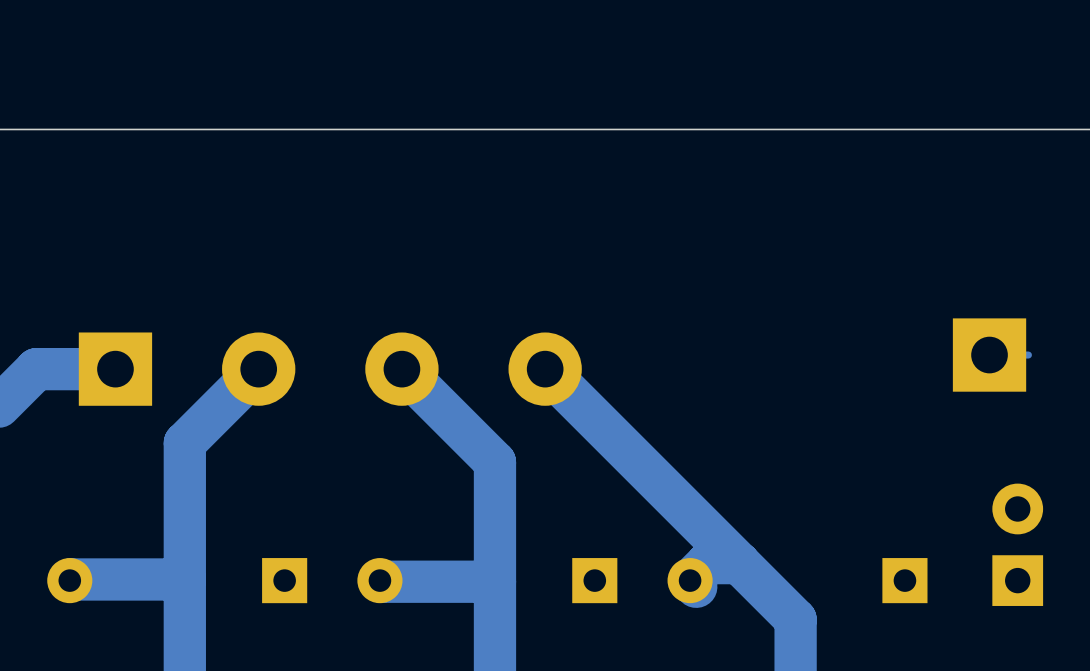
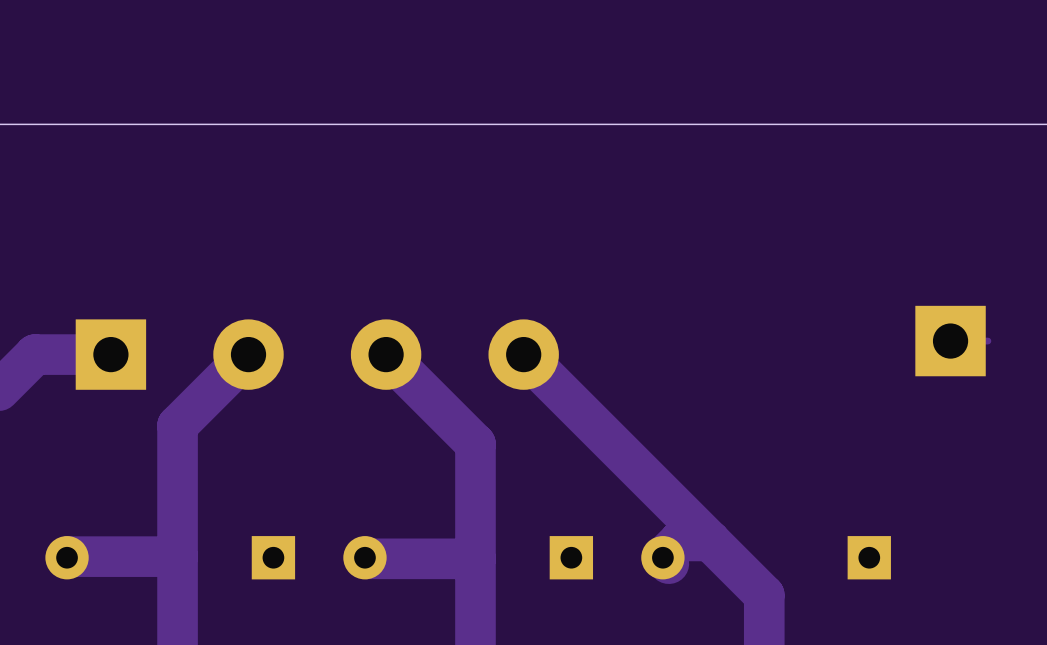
part: (1017, 544) -> none

